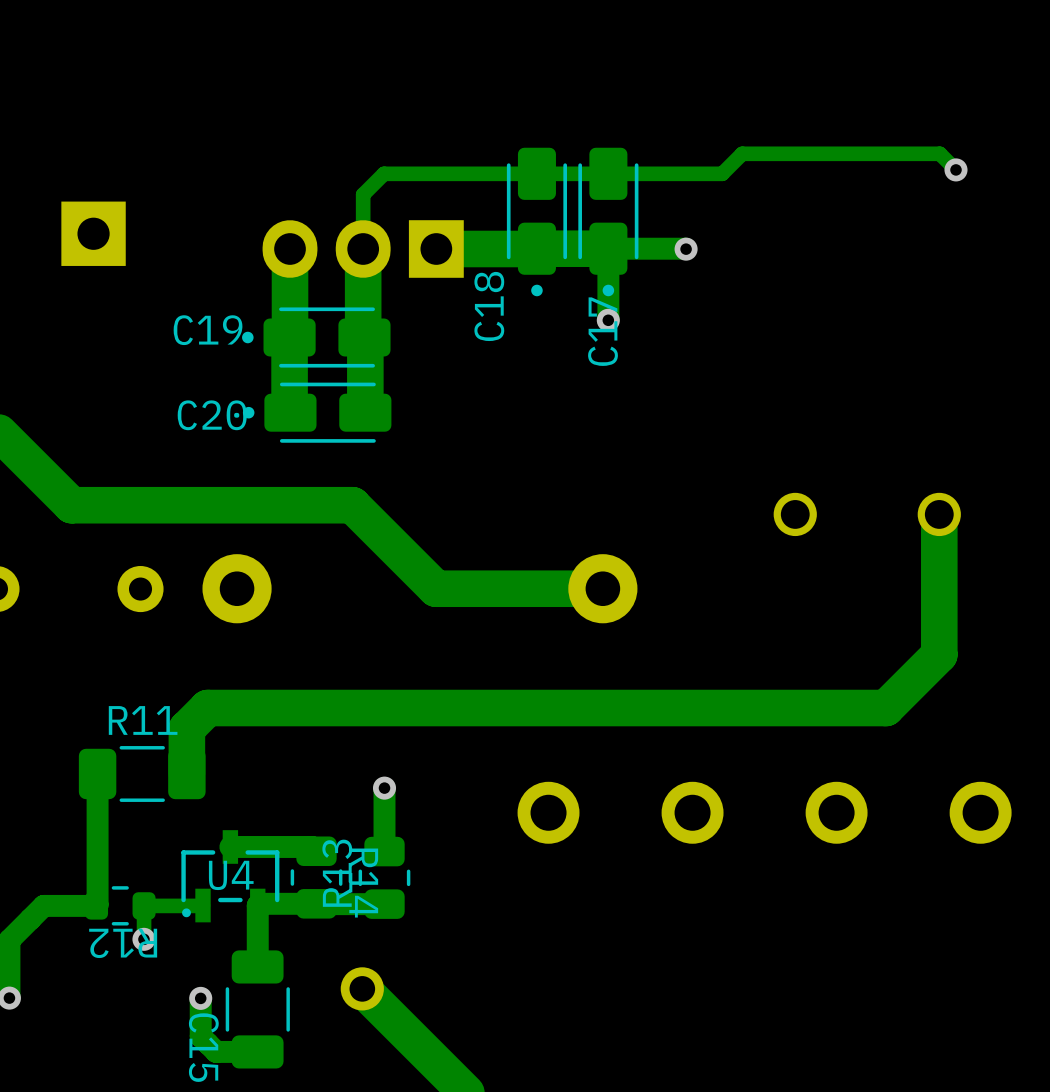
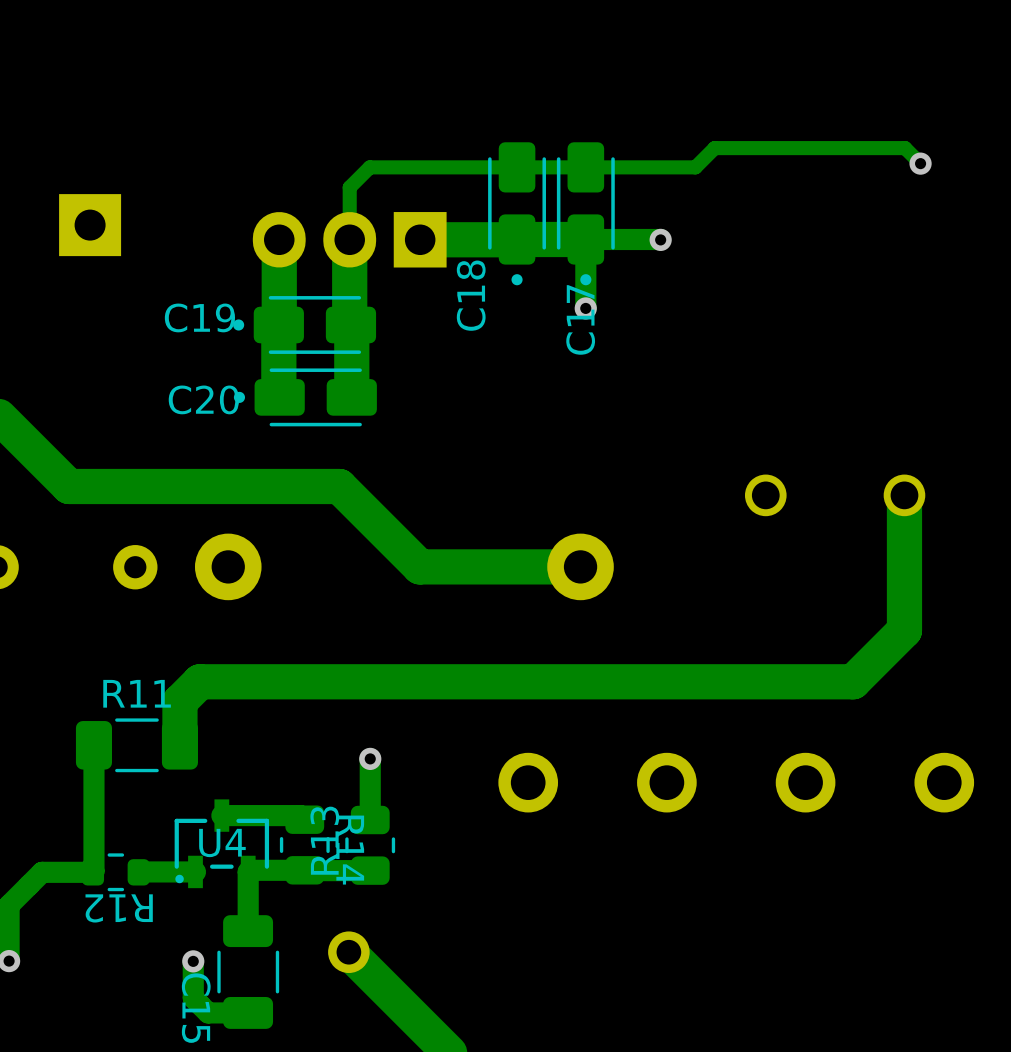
track: (202, 905) (144, 905) (144, 939) -> (195, 871) (139, 871)
via: (143, 939) -> none

